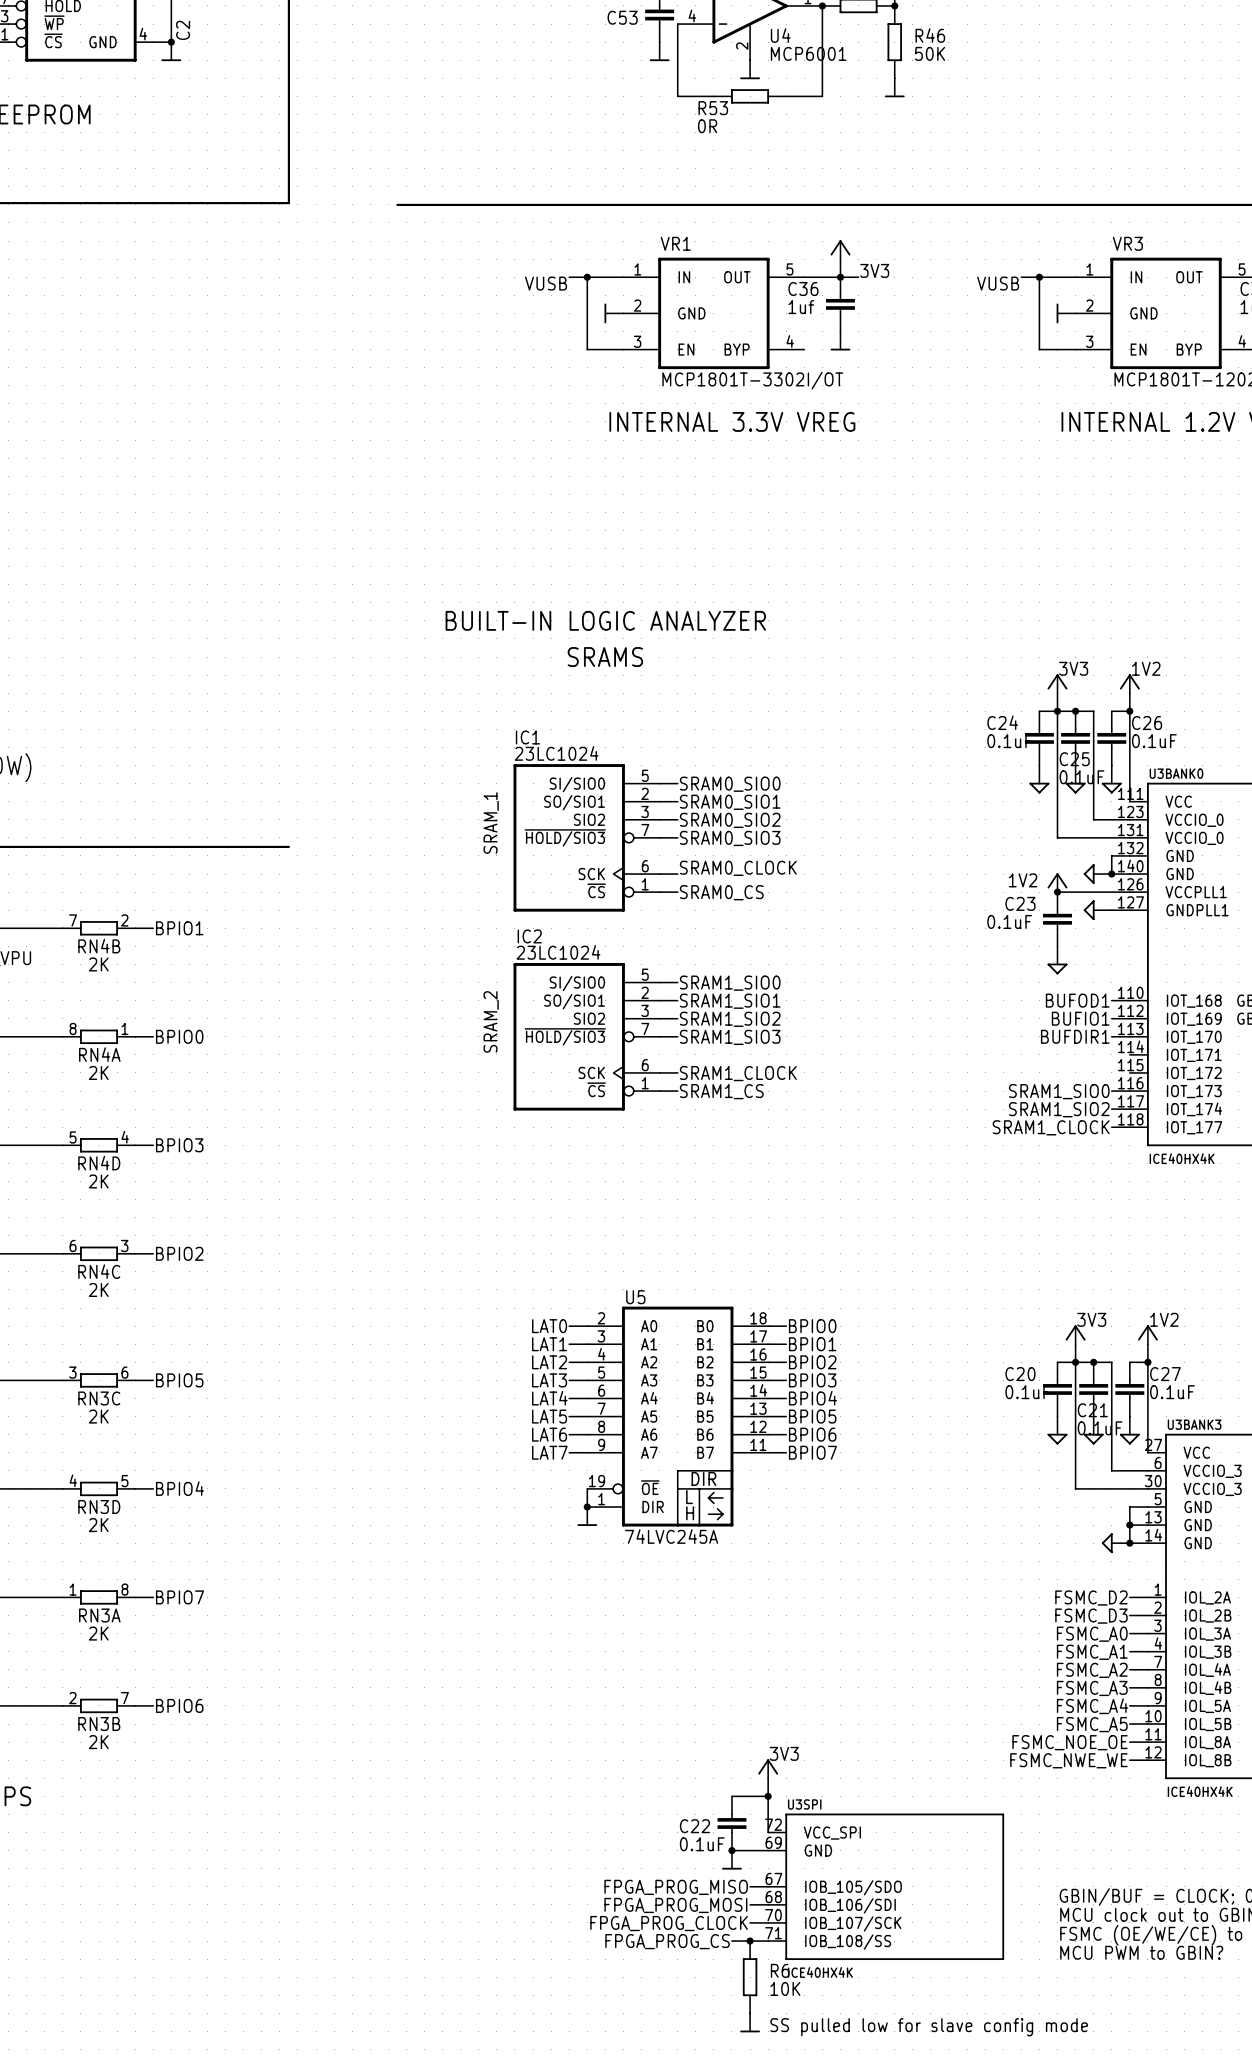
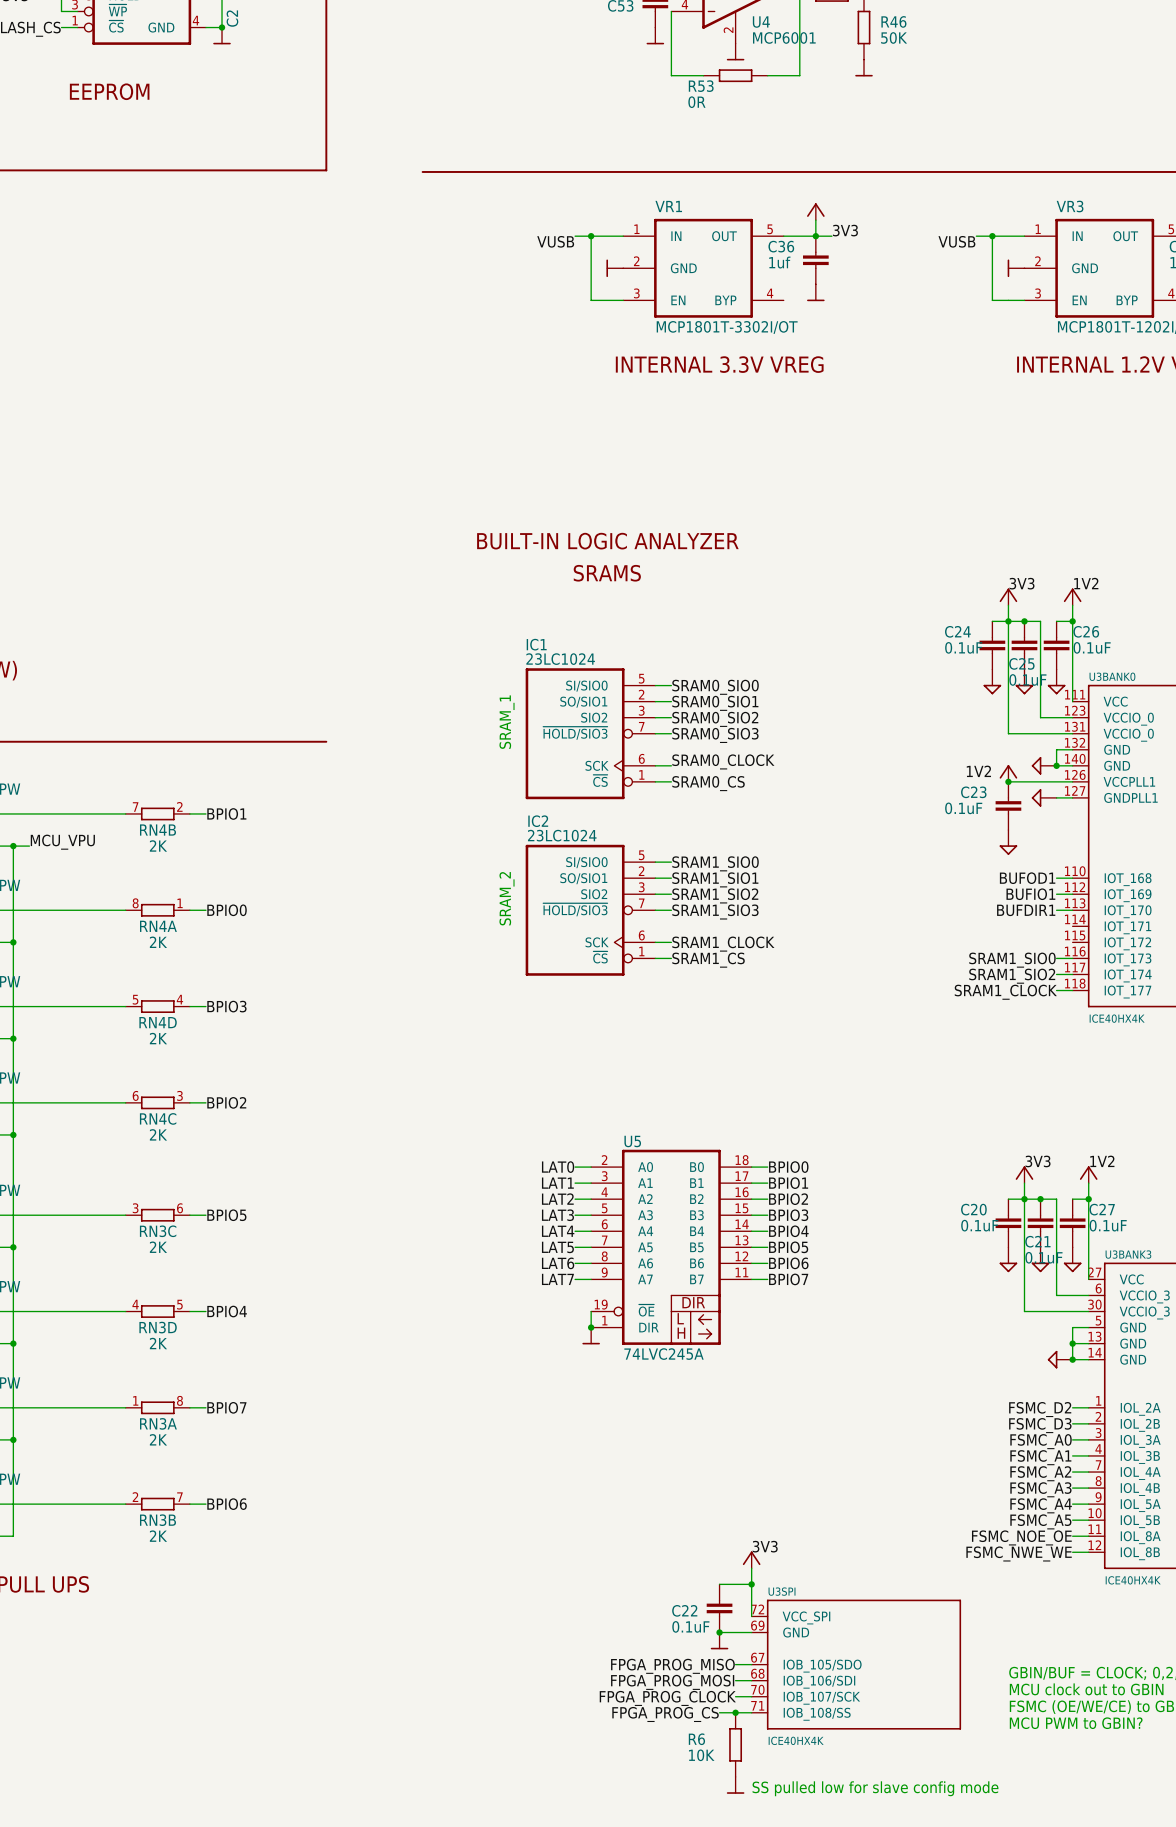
R6 name position: R6 (780, 1970) -> R6 (696, 1739)
R6 value position: 10K (785, 1988) -> 10K (701, 1755)

